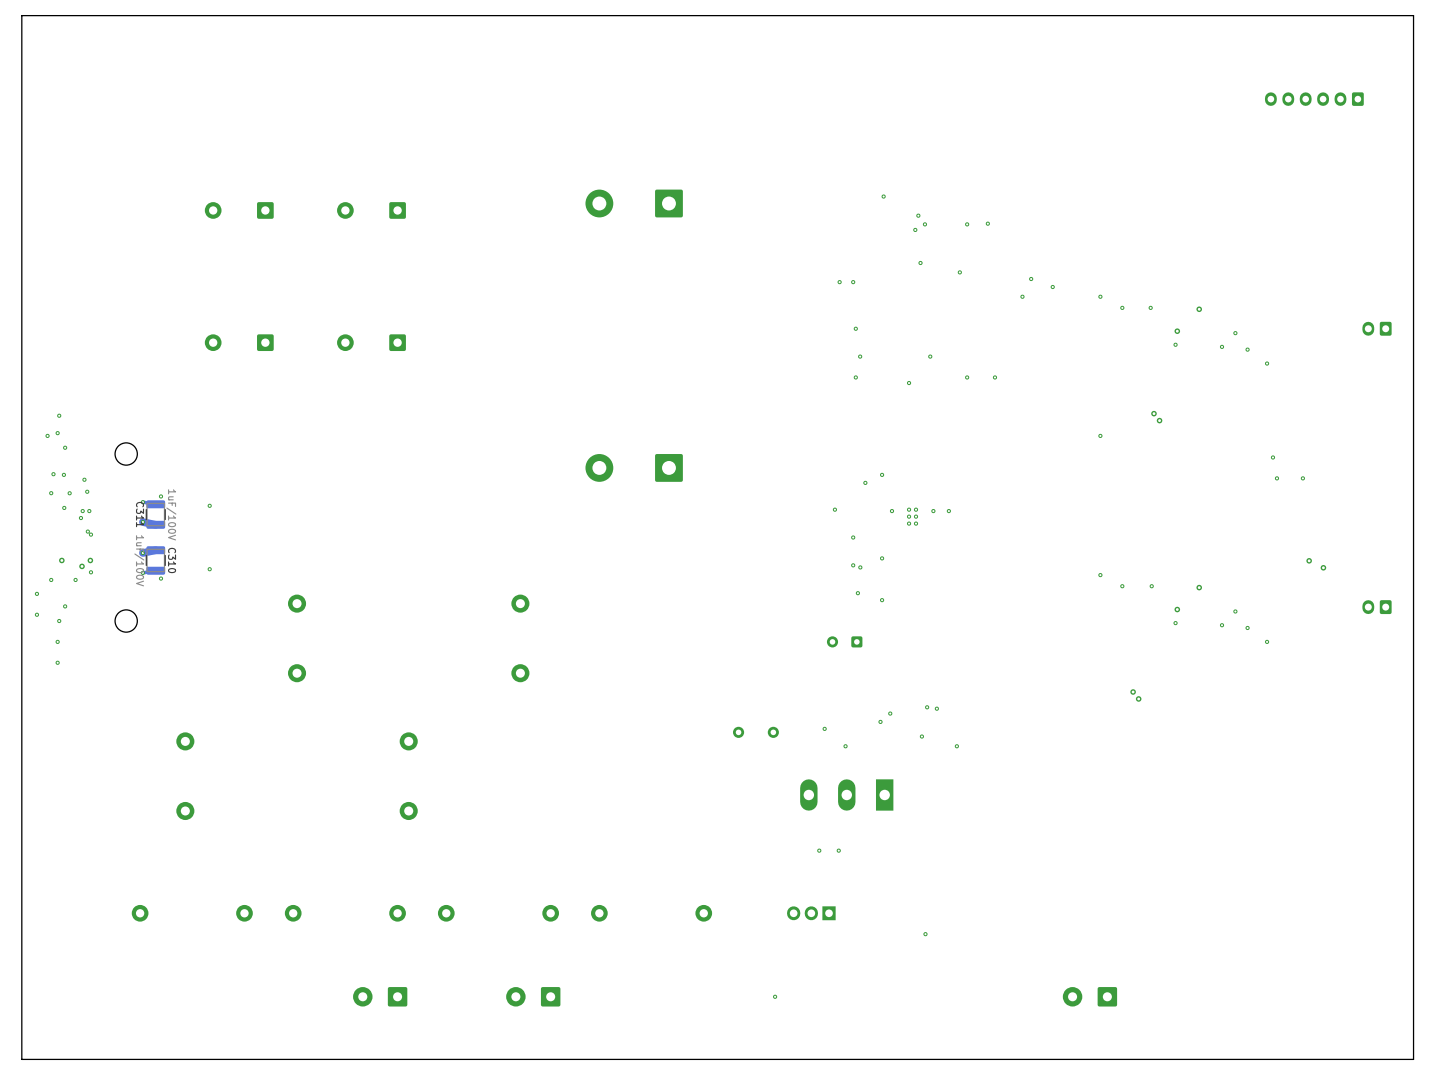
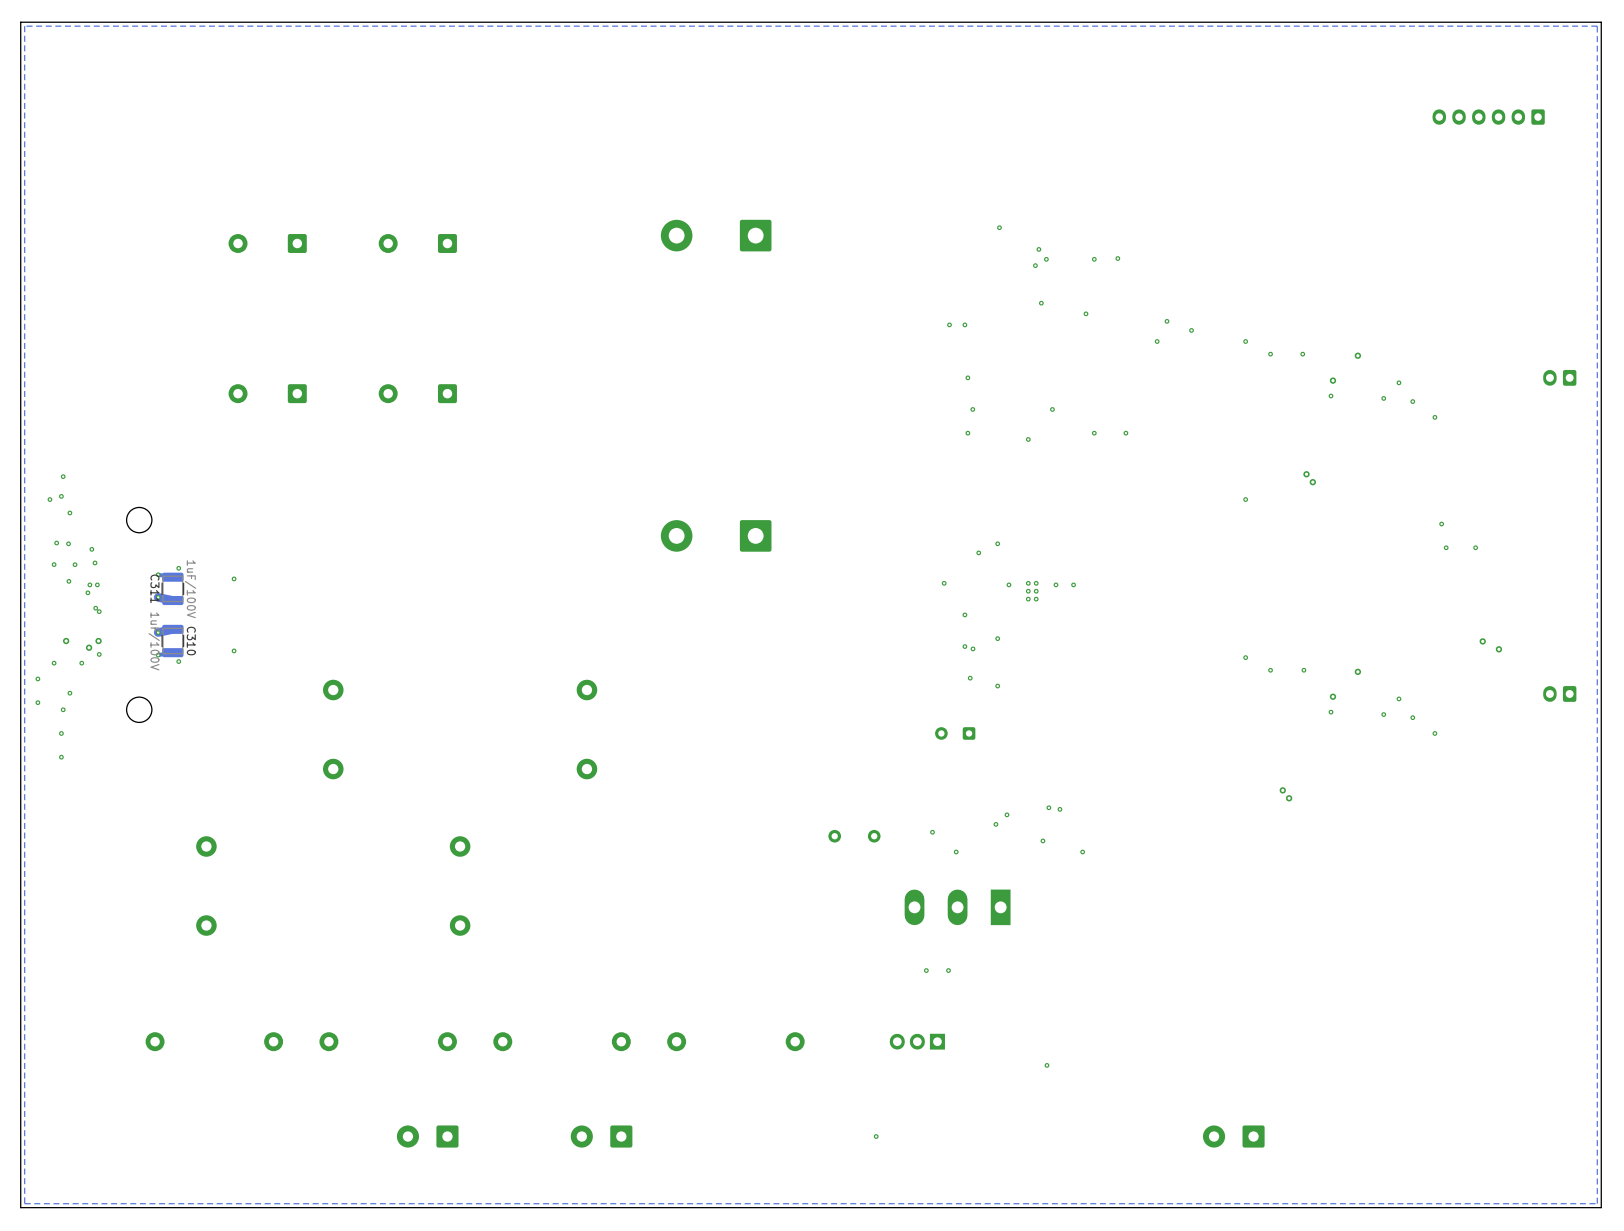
zone outline: none -> (1597, 26) (24, 26) (24, 1203) (1597, 1203) (1597, 26)

